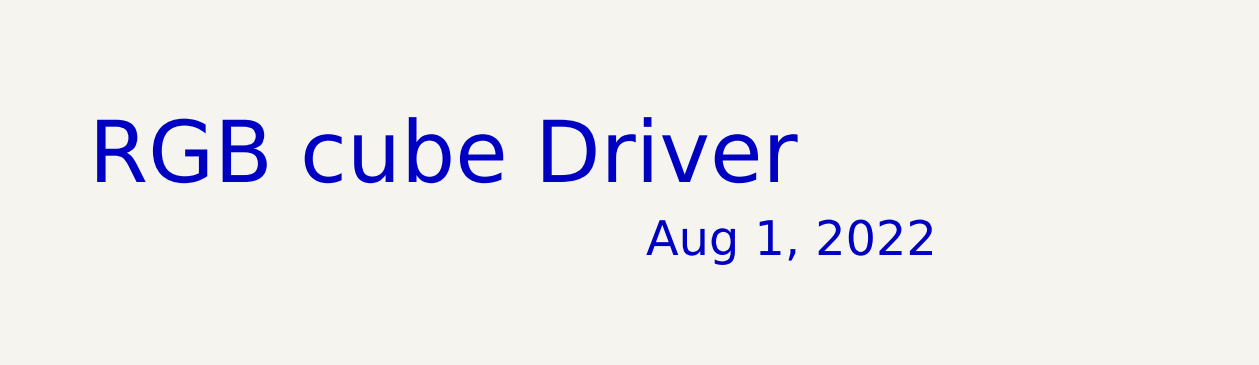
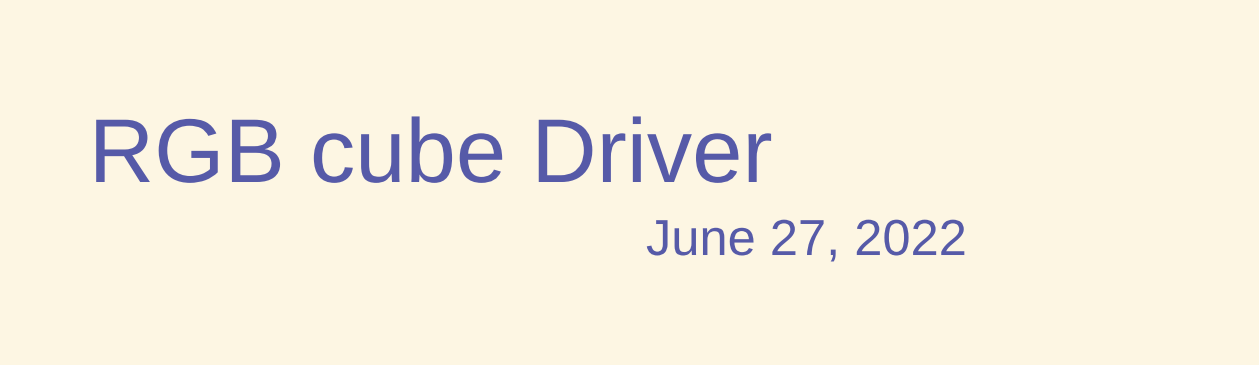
text: Aug 1, 2022 (789, 242) -> June 27, 2022 (805, 240)

